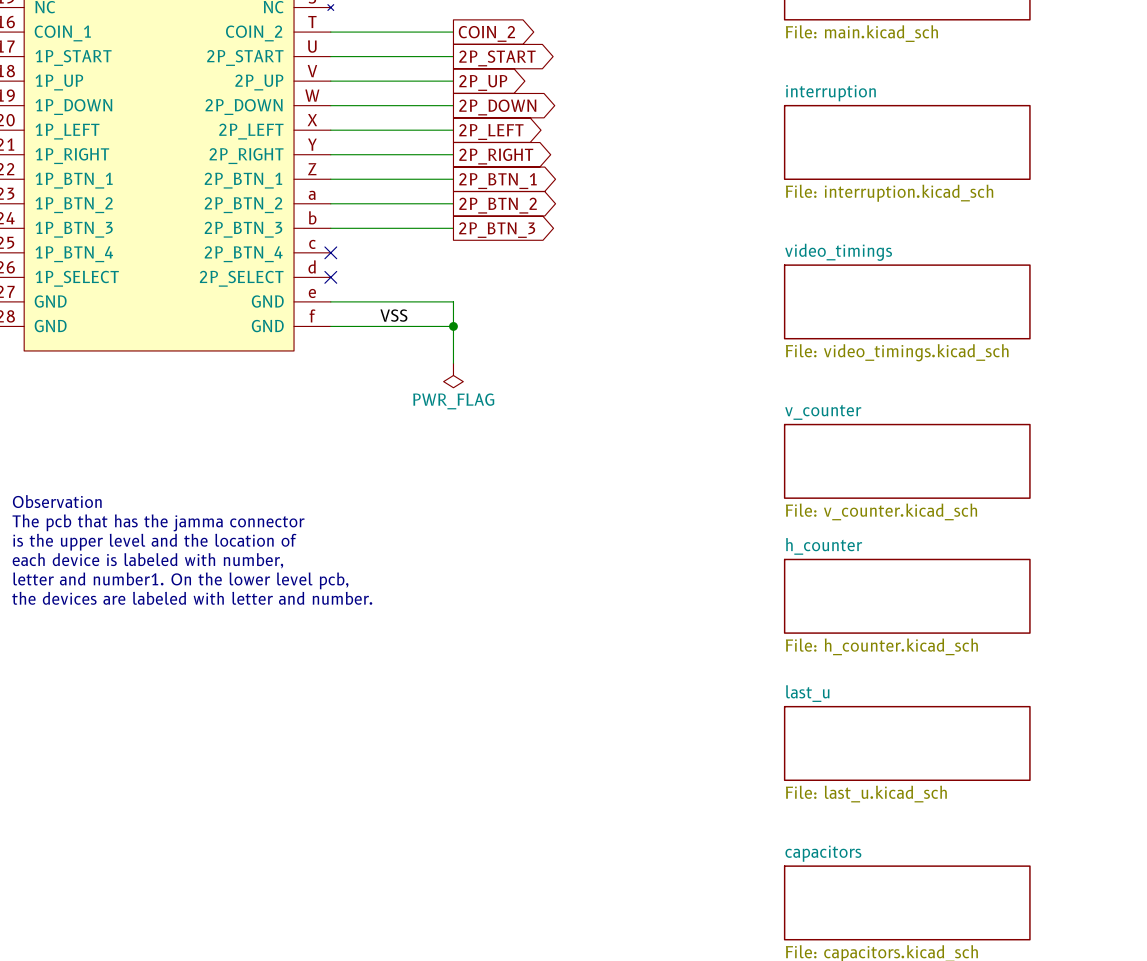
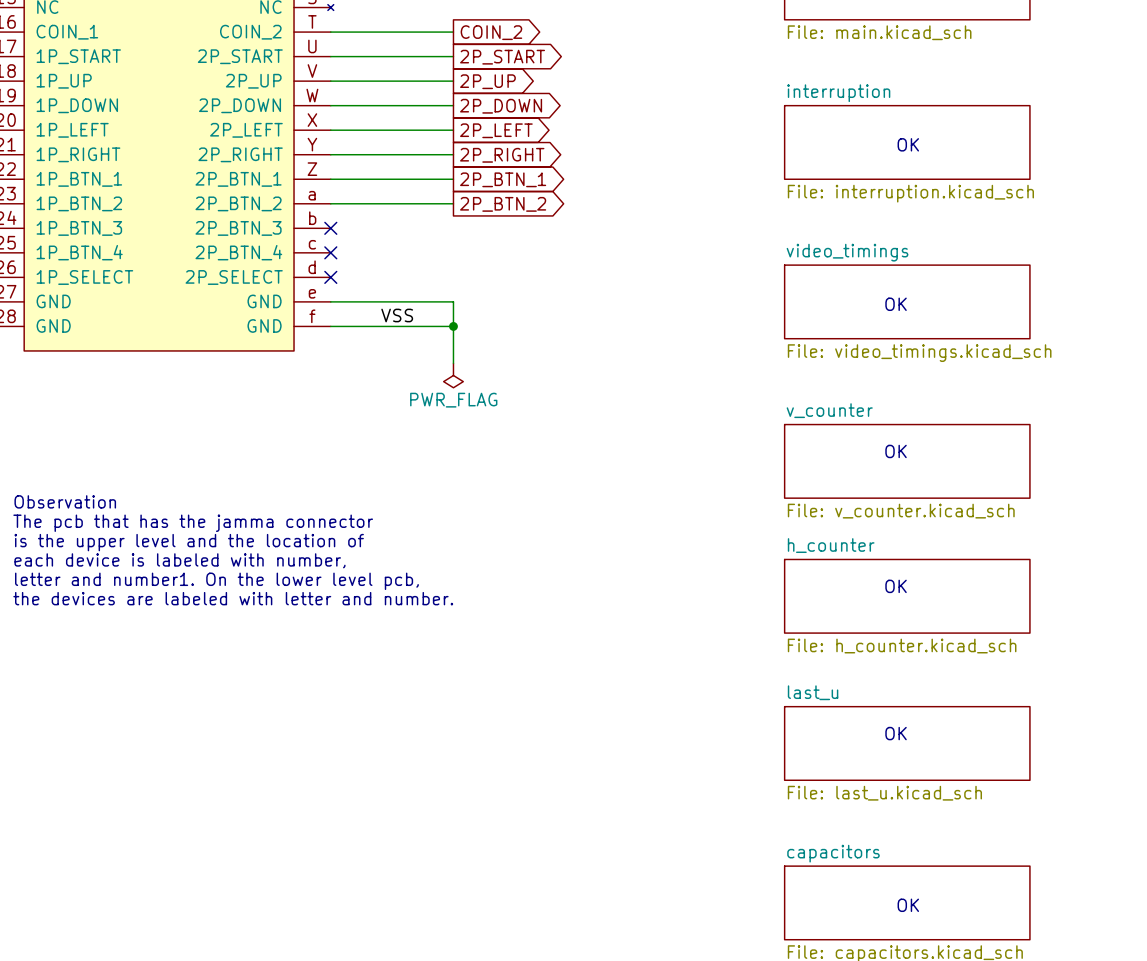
text: none -> OK (908, 144)
wire: (330, 228) (453, 228) -> none
no-connect mark: none -> (330, 228)
global label: 2P_BTN_3 (497, 230) -> none
text: none -> OK (896, 304)
text: none -> OK (896, 451)
text: none -> OK (896, 586)
text: none -> OK (896, 733)
text: none -> OK (908, 905)

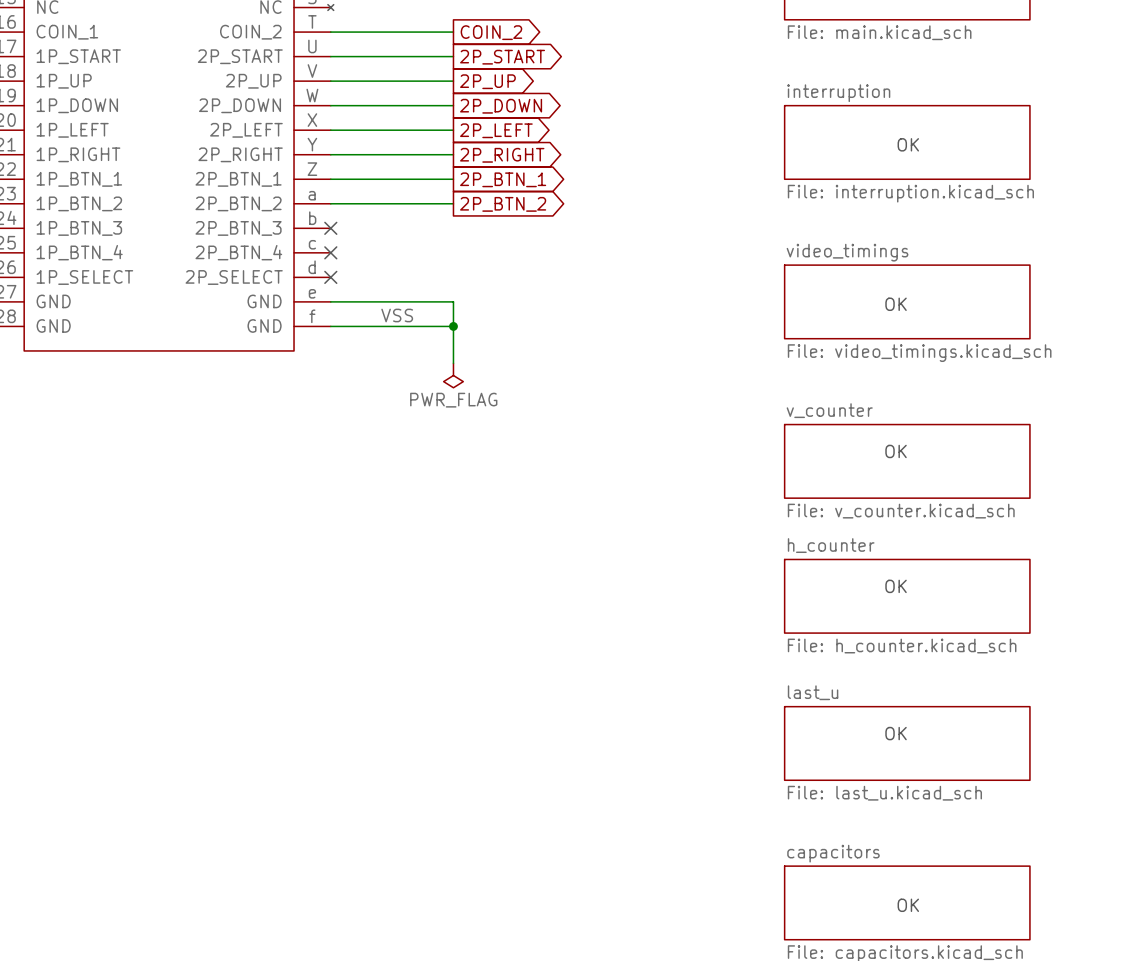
text: Observation (65, 501) -> none
text: The pcb that has the jamma connector (193, 523) -> none
text: is the upper level and the location of (189, 542) -> none
text: each device is labeled with number, (180, 560) -> none
text: letter and number1. On the lower level pcb, (216, 581) -> none
text: the devices are labeled with letter and number. (233, 598) -> none

